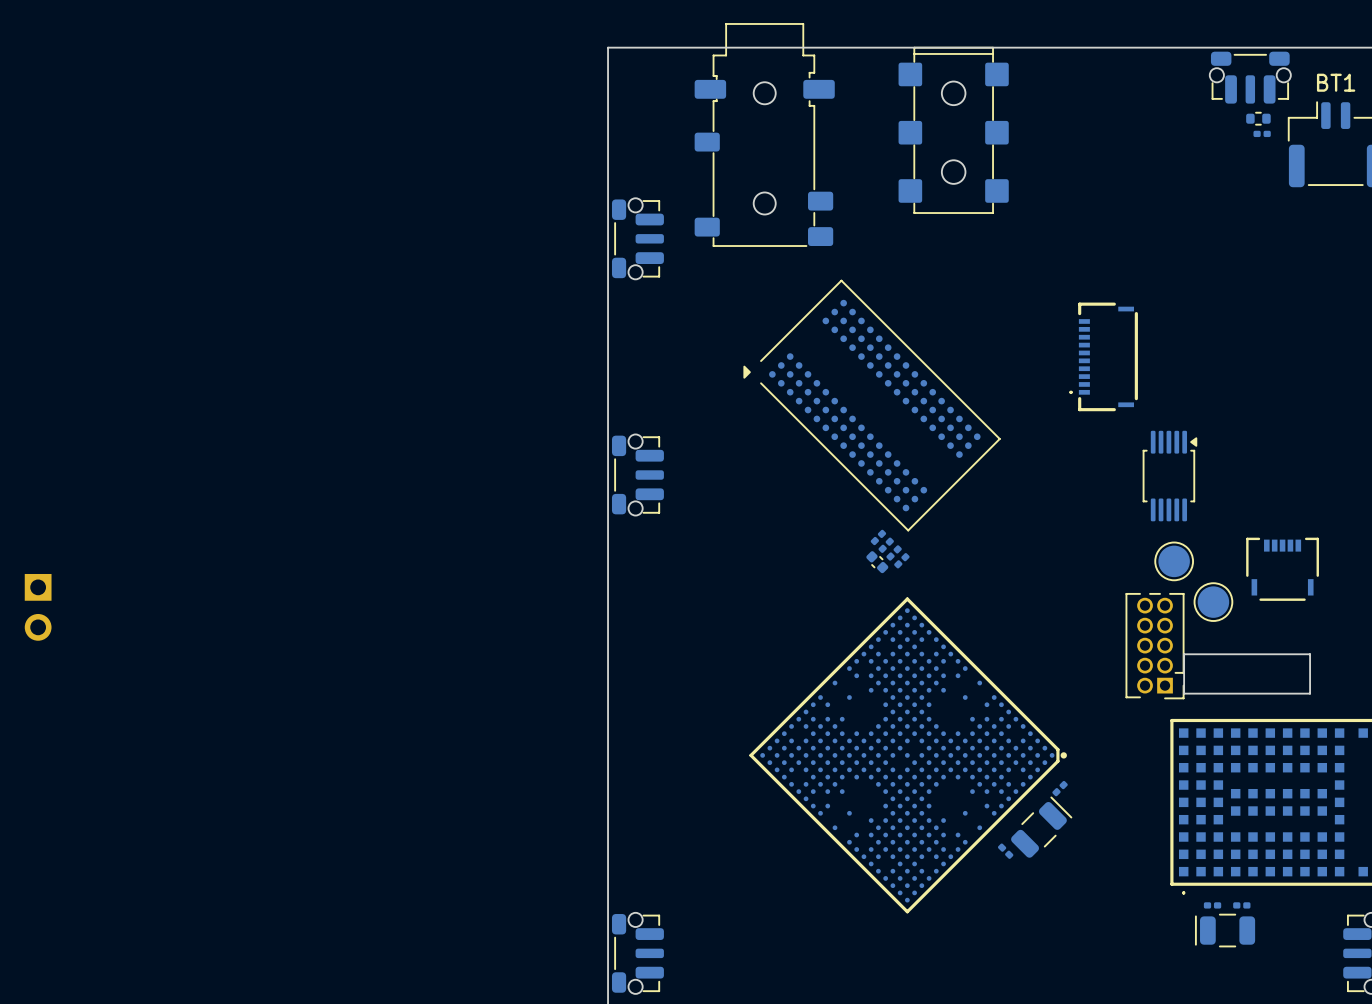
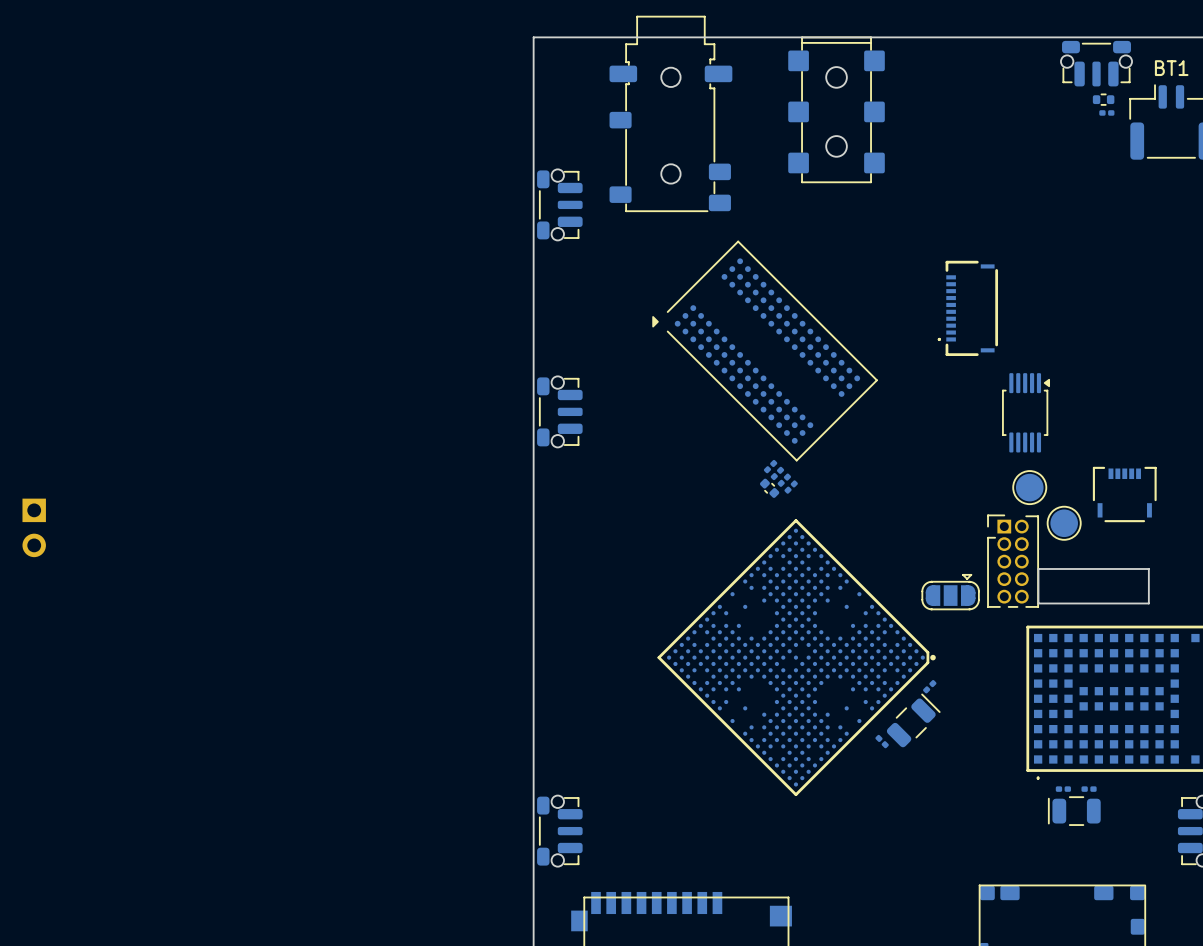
part rotation: 0° (1155, 646) -> 180° (1013, 561)
part: none -> (950, 592)

